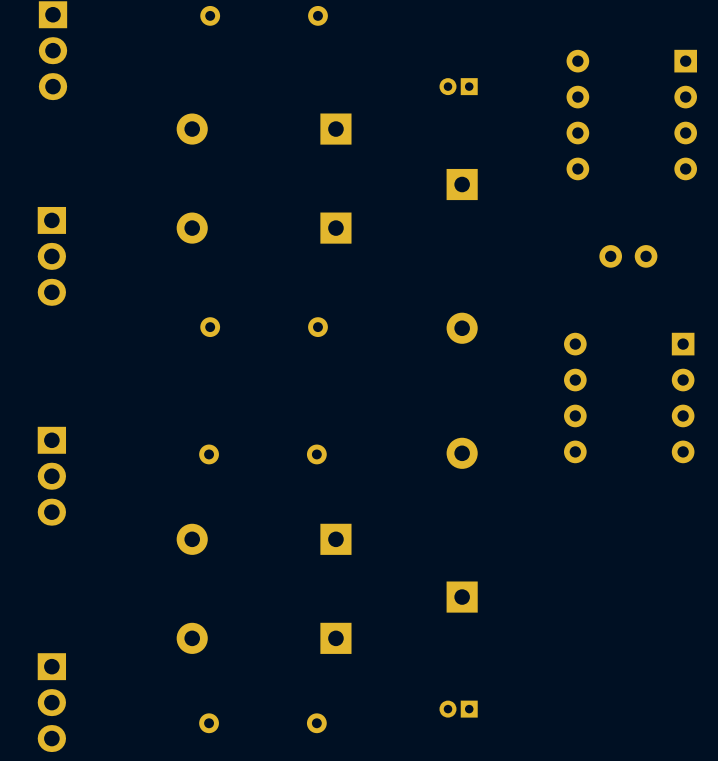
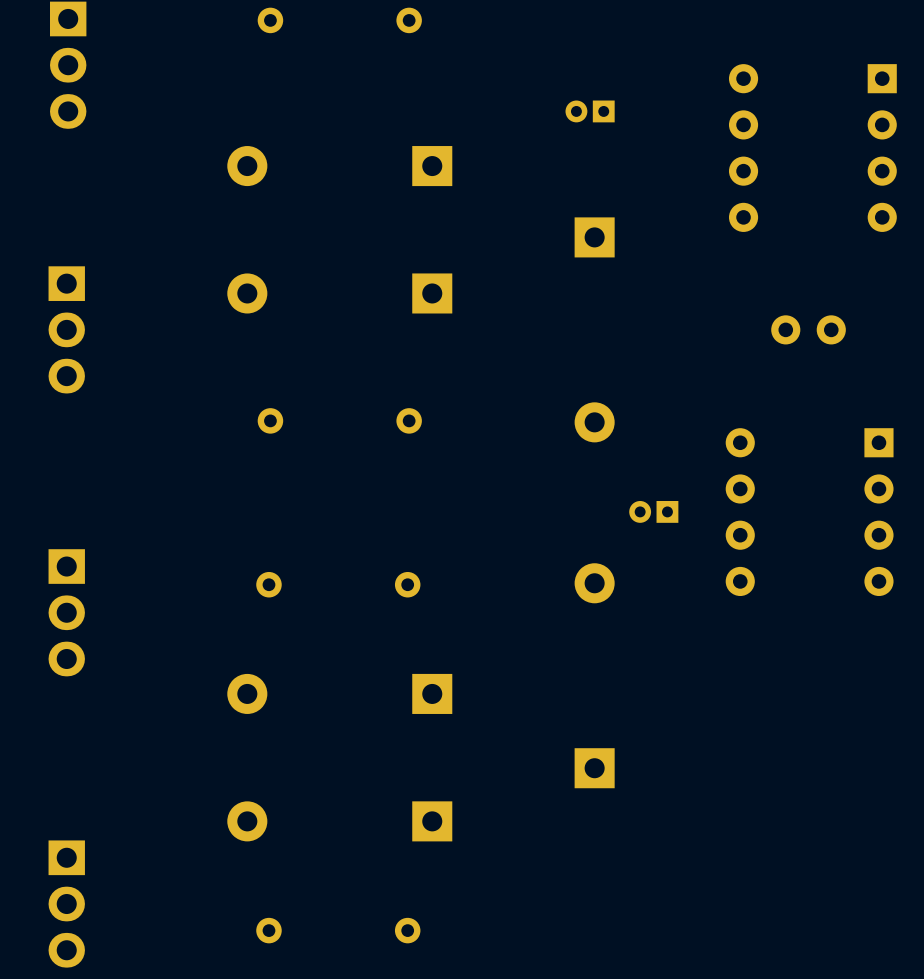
part position: (458, 709) -> (653, 511)

